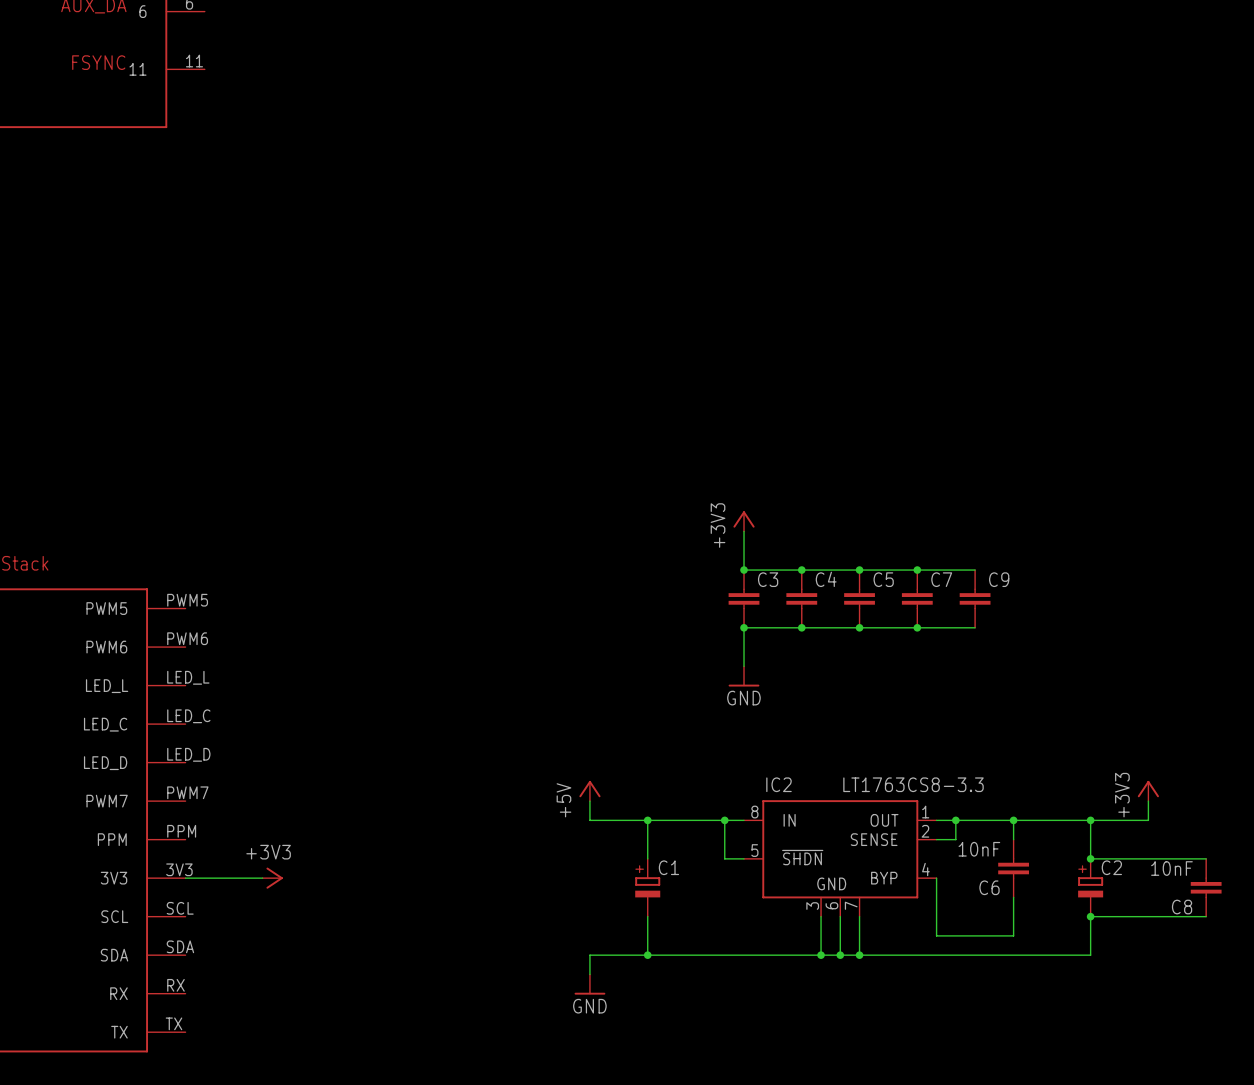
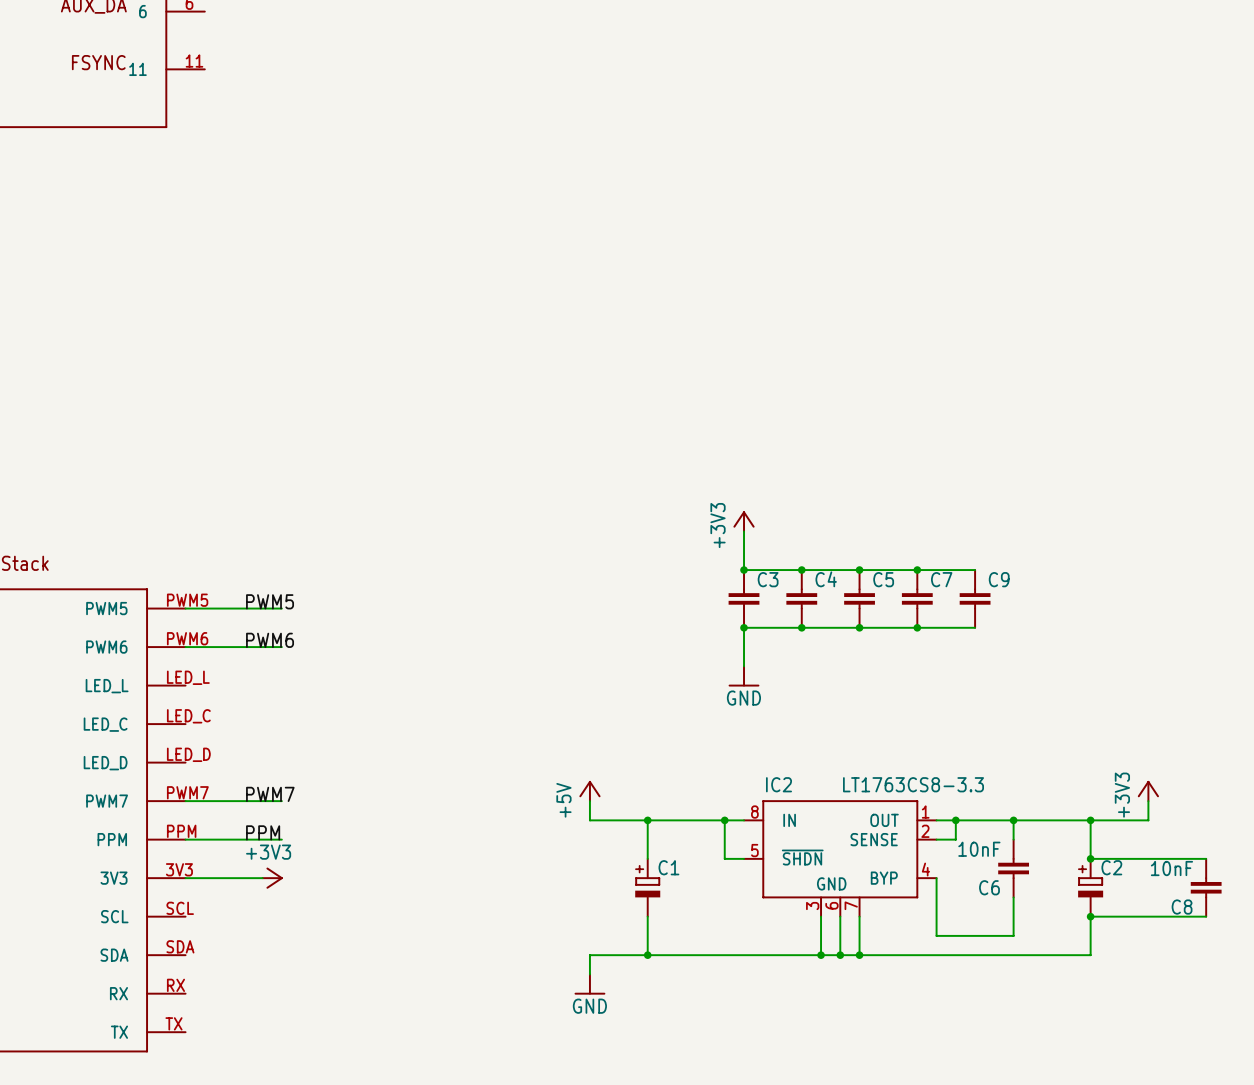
label: none -> PWM5 (270, 601)
wire: none -> (185, 608) (281, 608)
label: none -> PWM6 (270, 640)
wire: none -> (185, 647) (281, 647)
label: none -> PWM7 (270, 794)
wire: none -> (185, 801) (281, 801)
label: none -> PPM (263, 832)
wire: none -> (185, 839) (281, 839)

